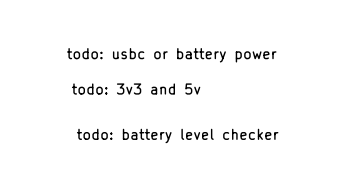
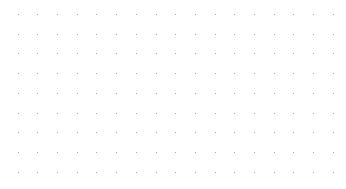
text: todo: usbc or battery power (171, 55) -> none
text: todo: 3v3 and 5v (136, 89) -> none
text: todo: battery level checker (177, 135) -> none

